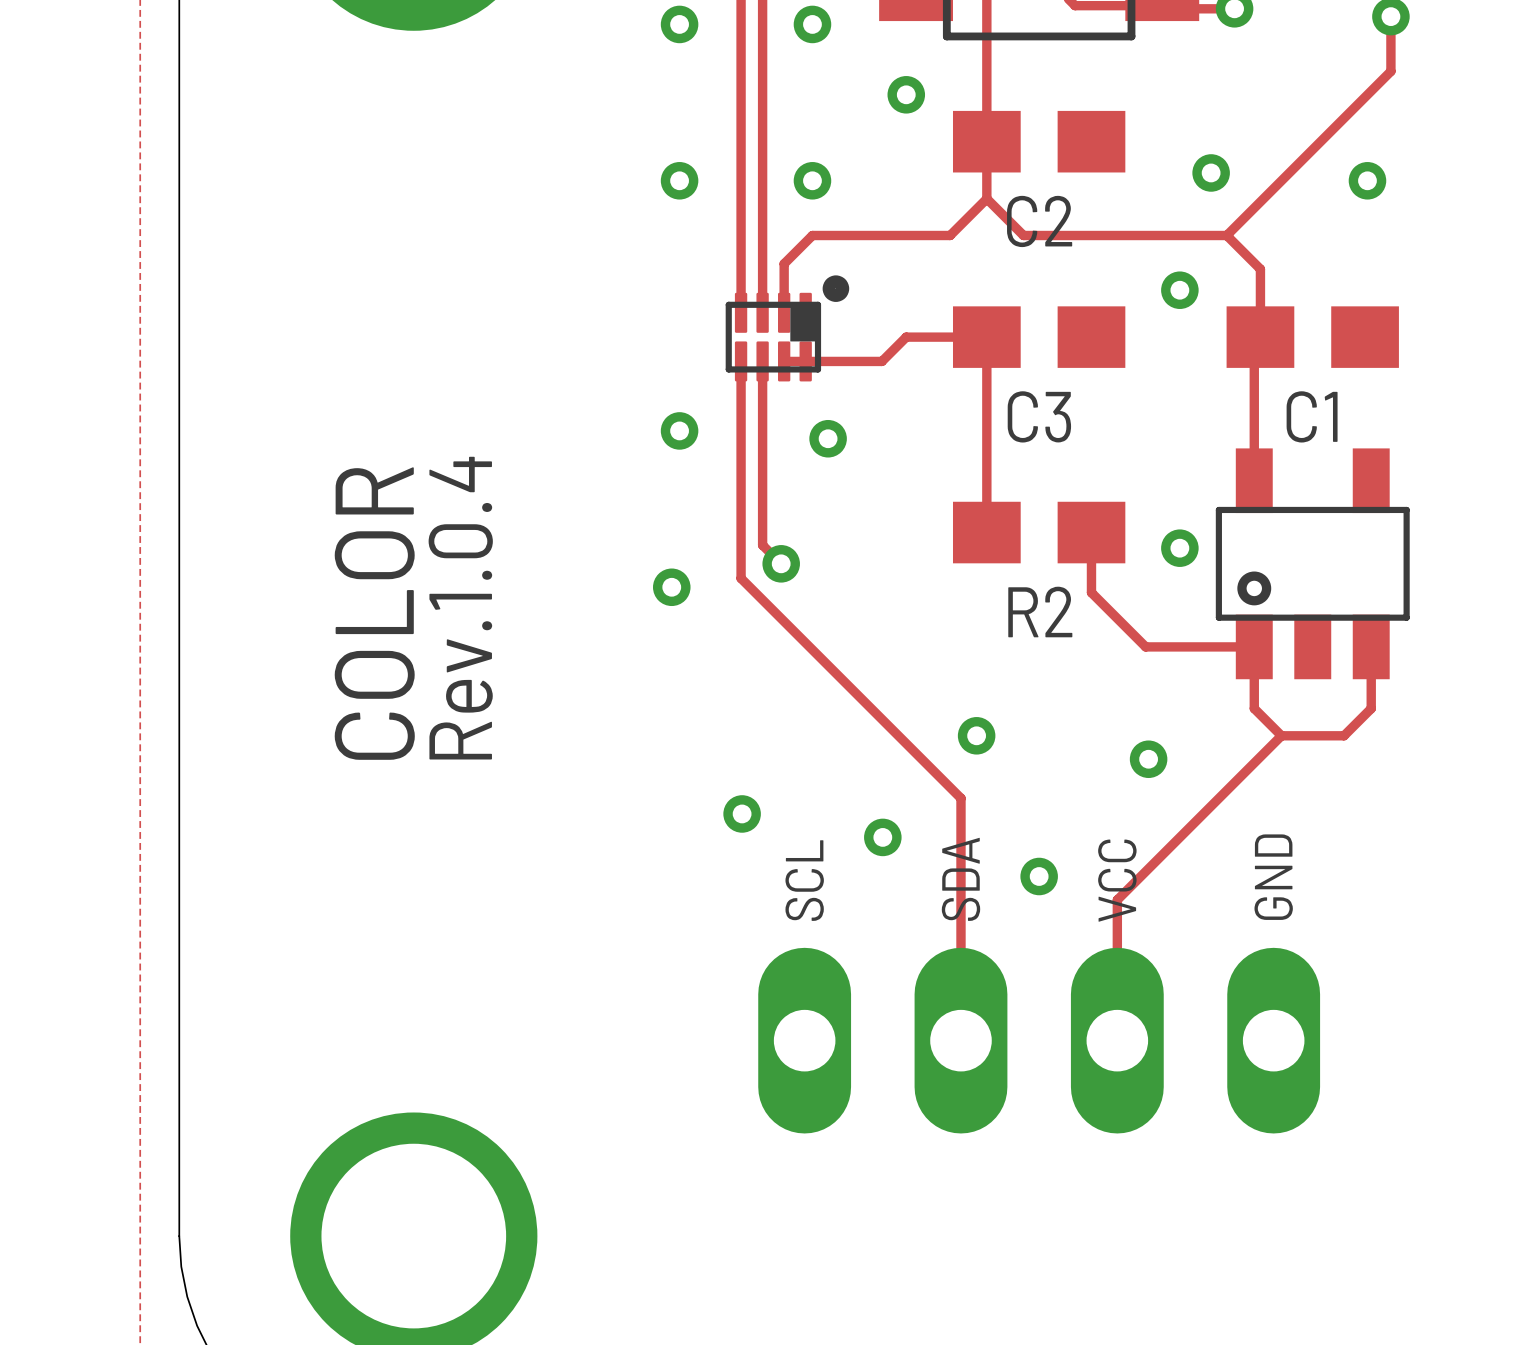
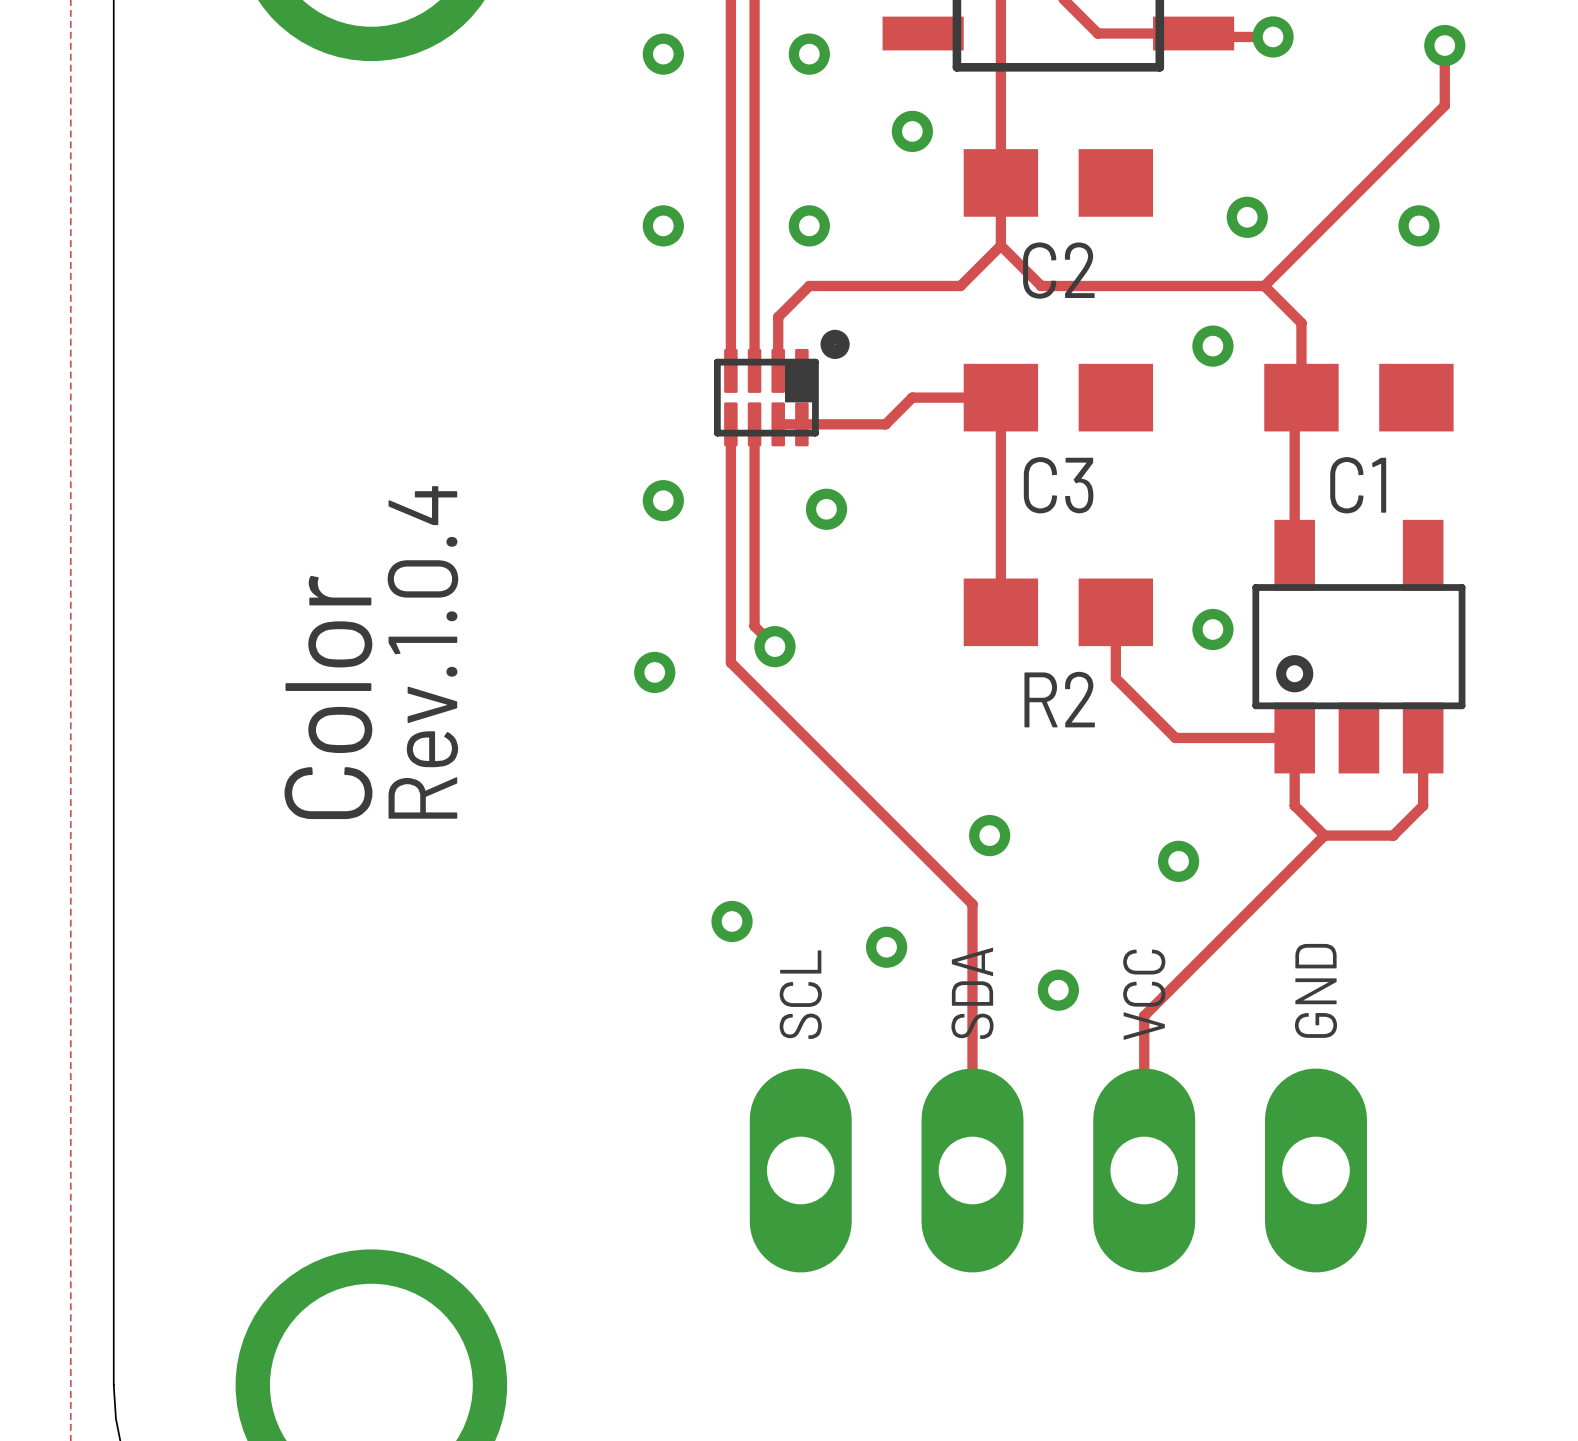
text position: Rev.1.0.4 (460, 608) -> Rev.1.0.4 (422, 652)
text: COLOR (374, 613) -> Color (328, 697)

